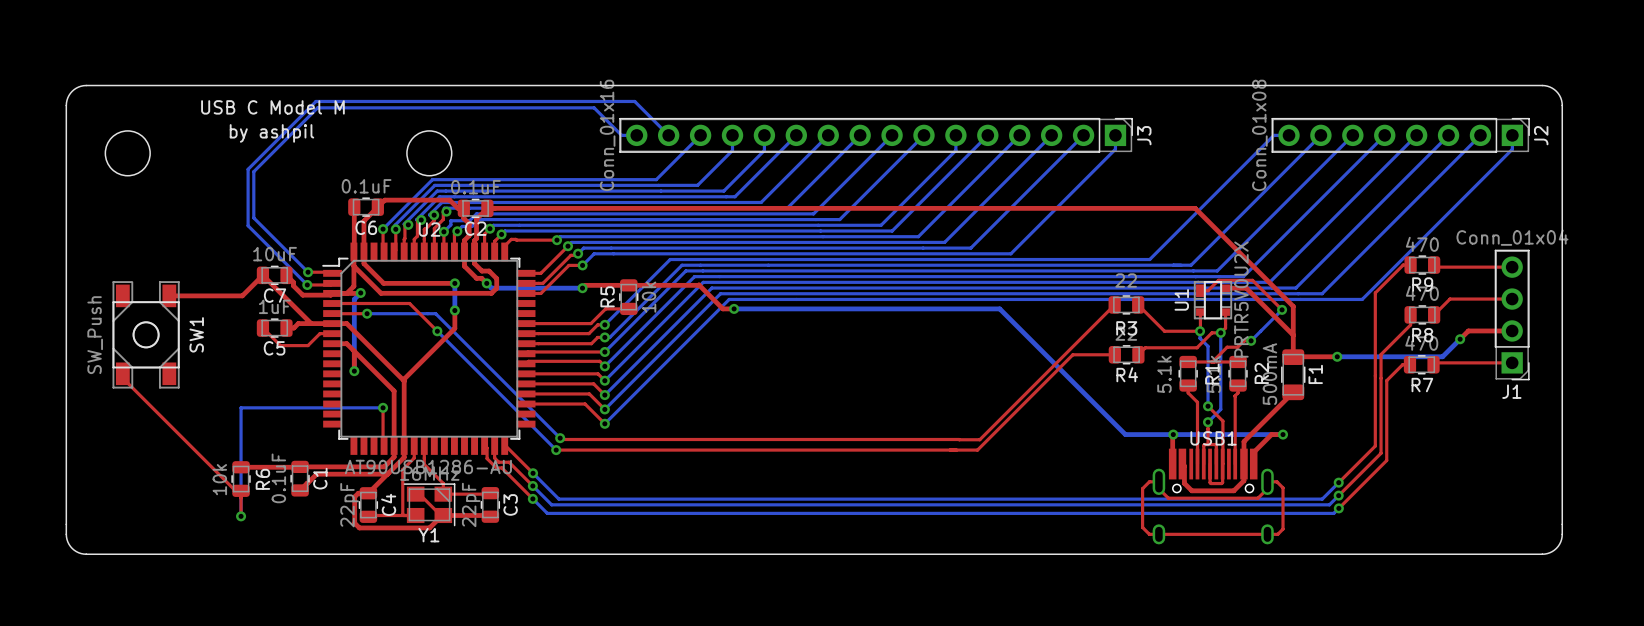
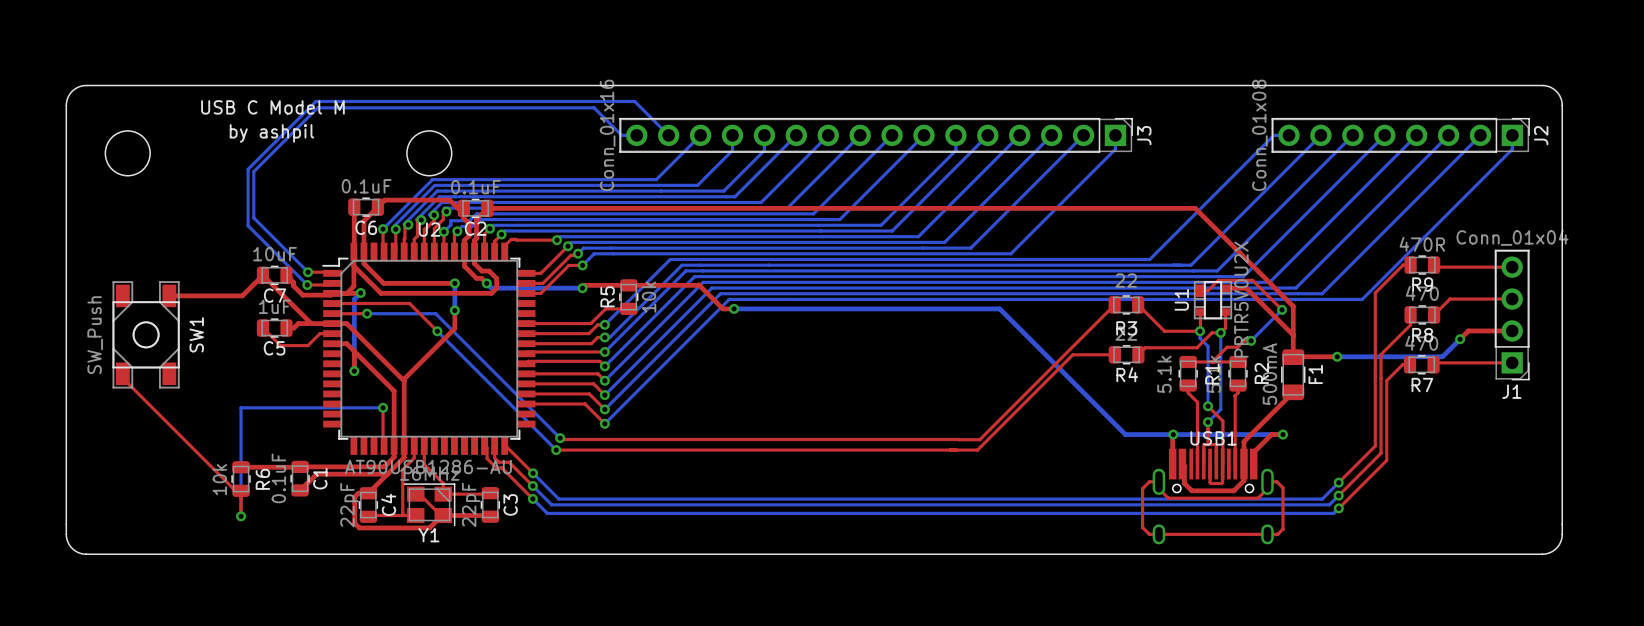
R9 value: 470 (1422, 244) -> 470R (1422, 244)

